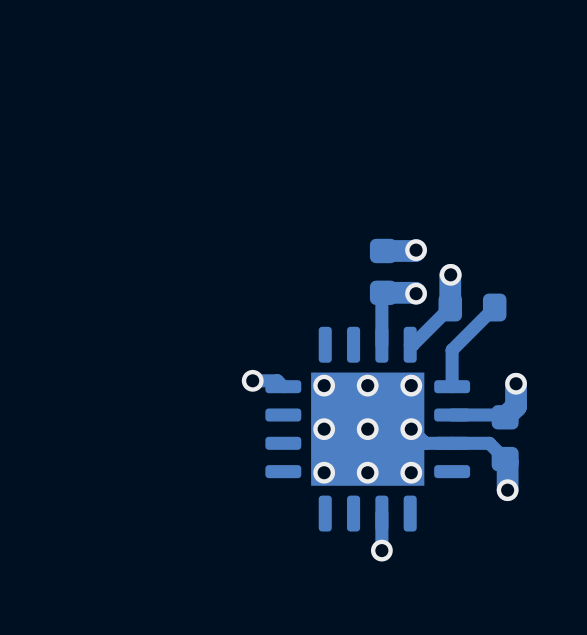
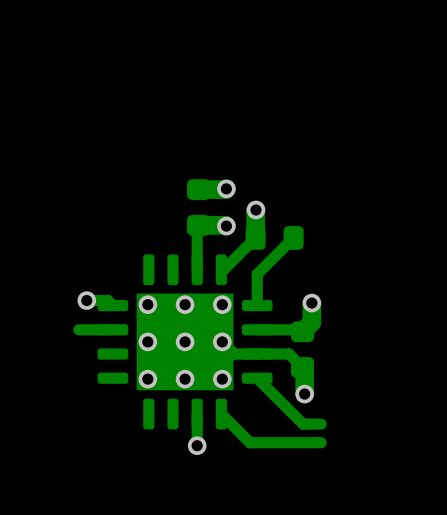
bottom track: none -> (78, 329) (112, 329)
bottom track: none -> (257, 378) (303, 424) (321, 424)
bottom track: none -> (221, 414) (250, 442) (321, 442)

